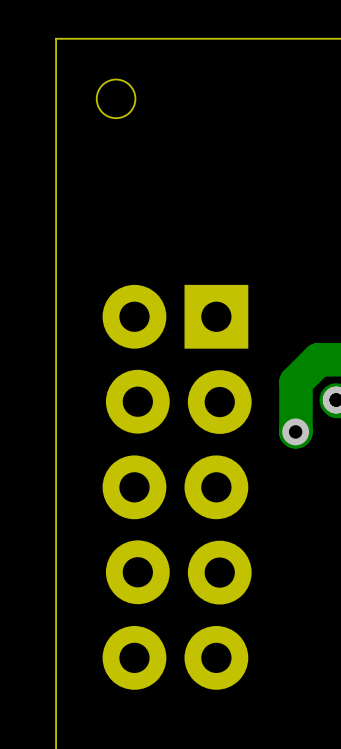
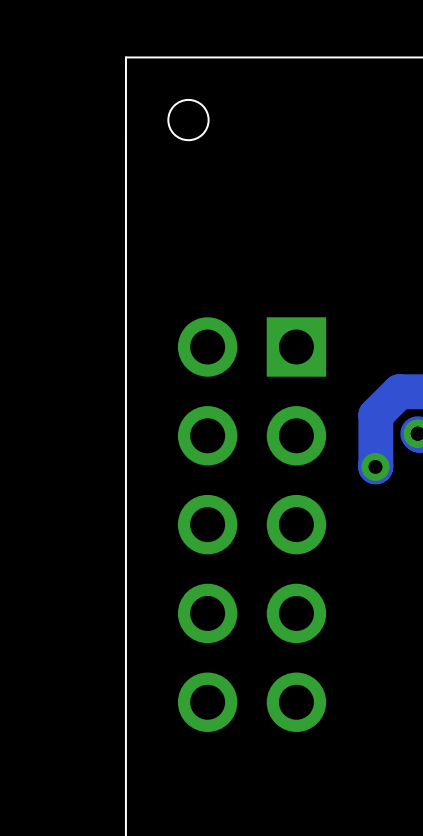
part footprint: [102, 284, 252, 690] -> [177, 317, 327, 732]

